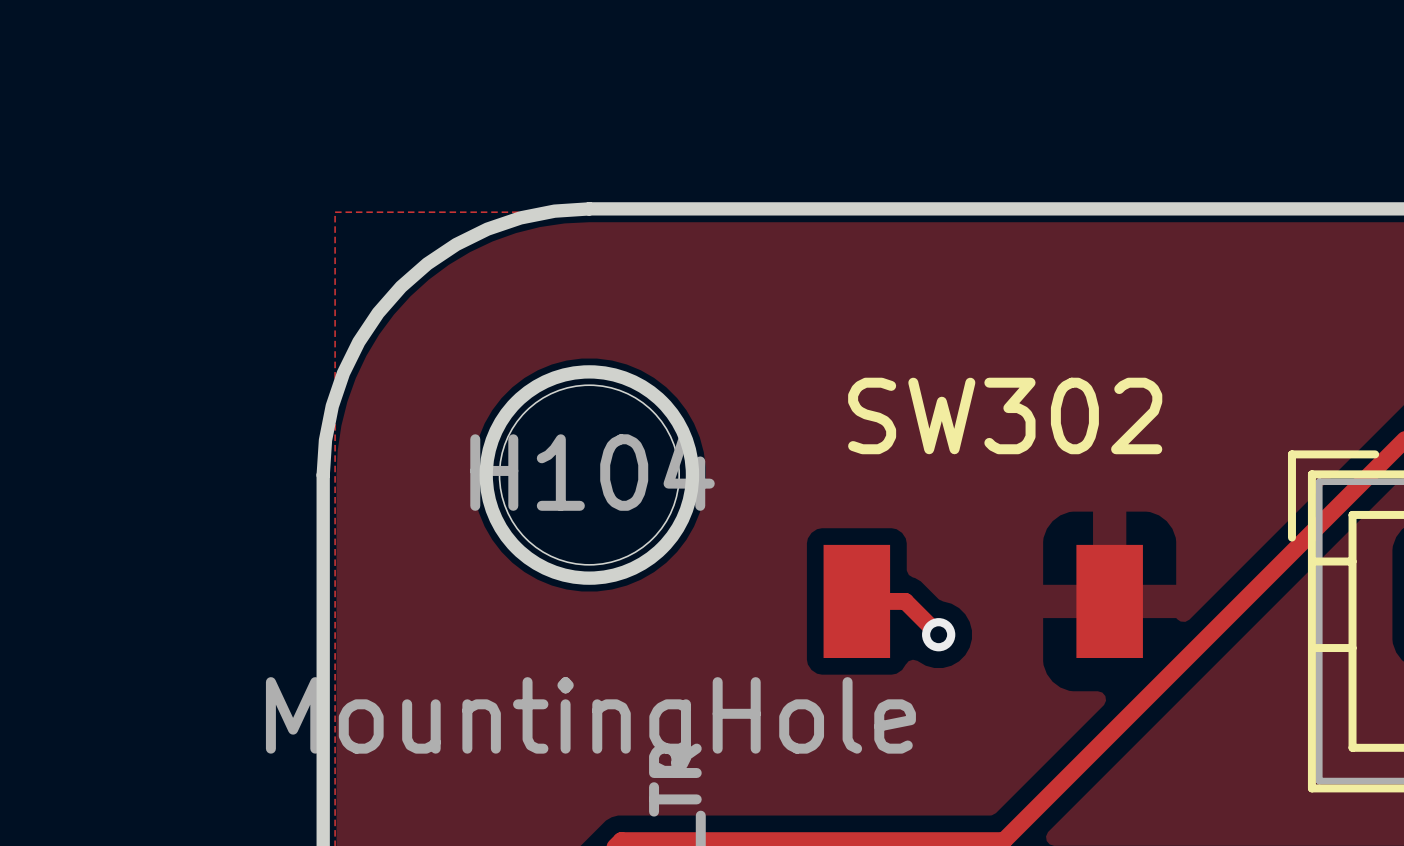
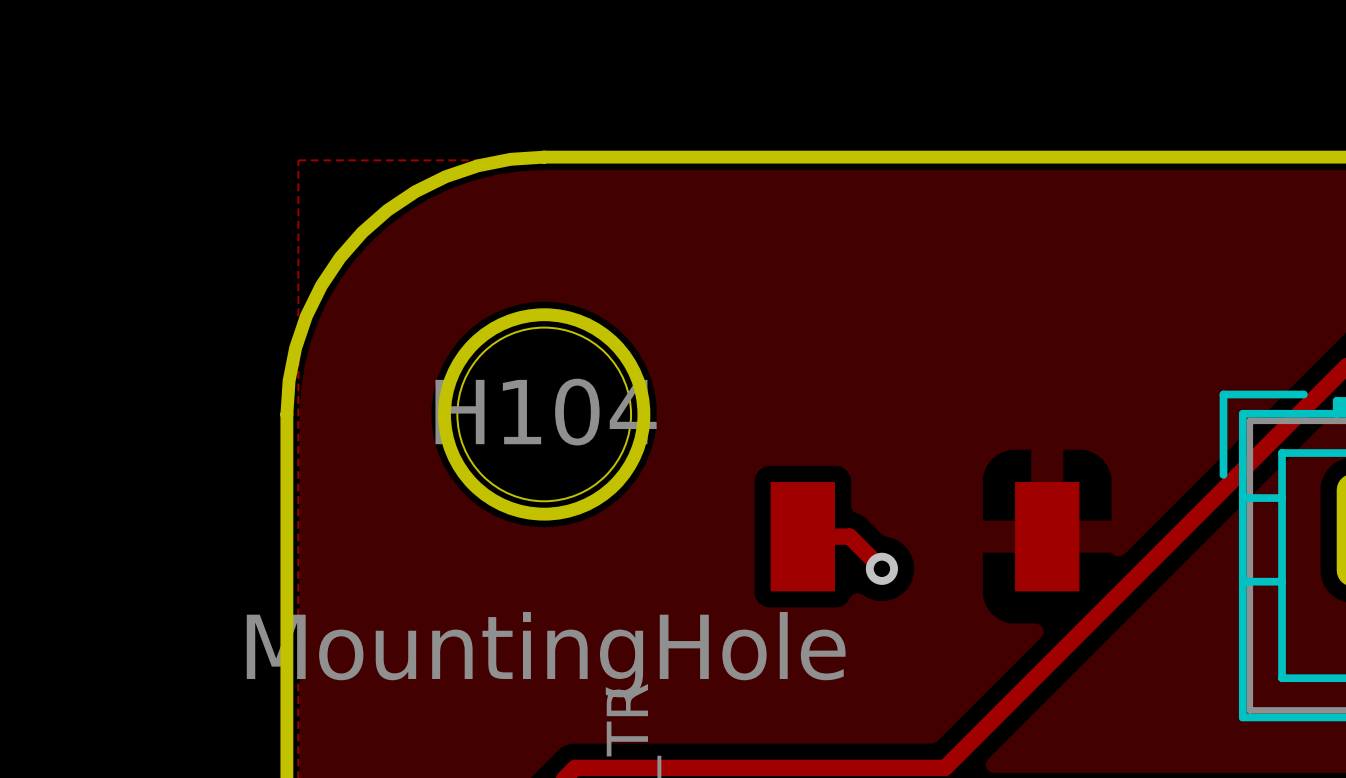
SW302 name: SW302 (1005, 415) -> none

